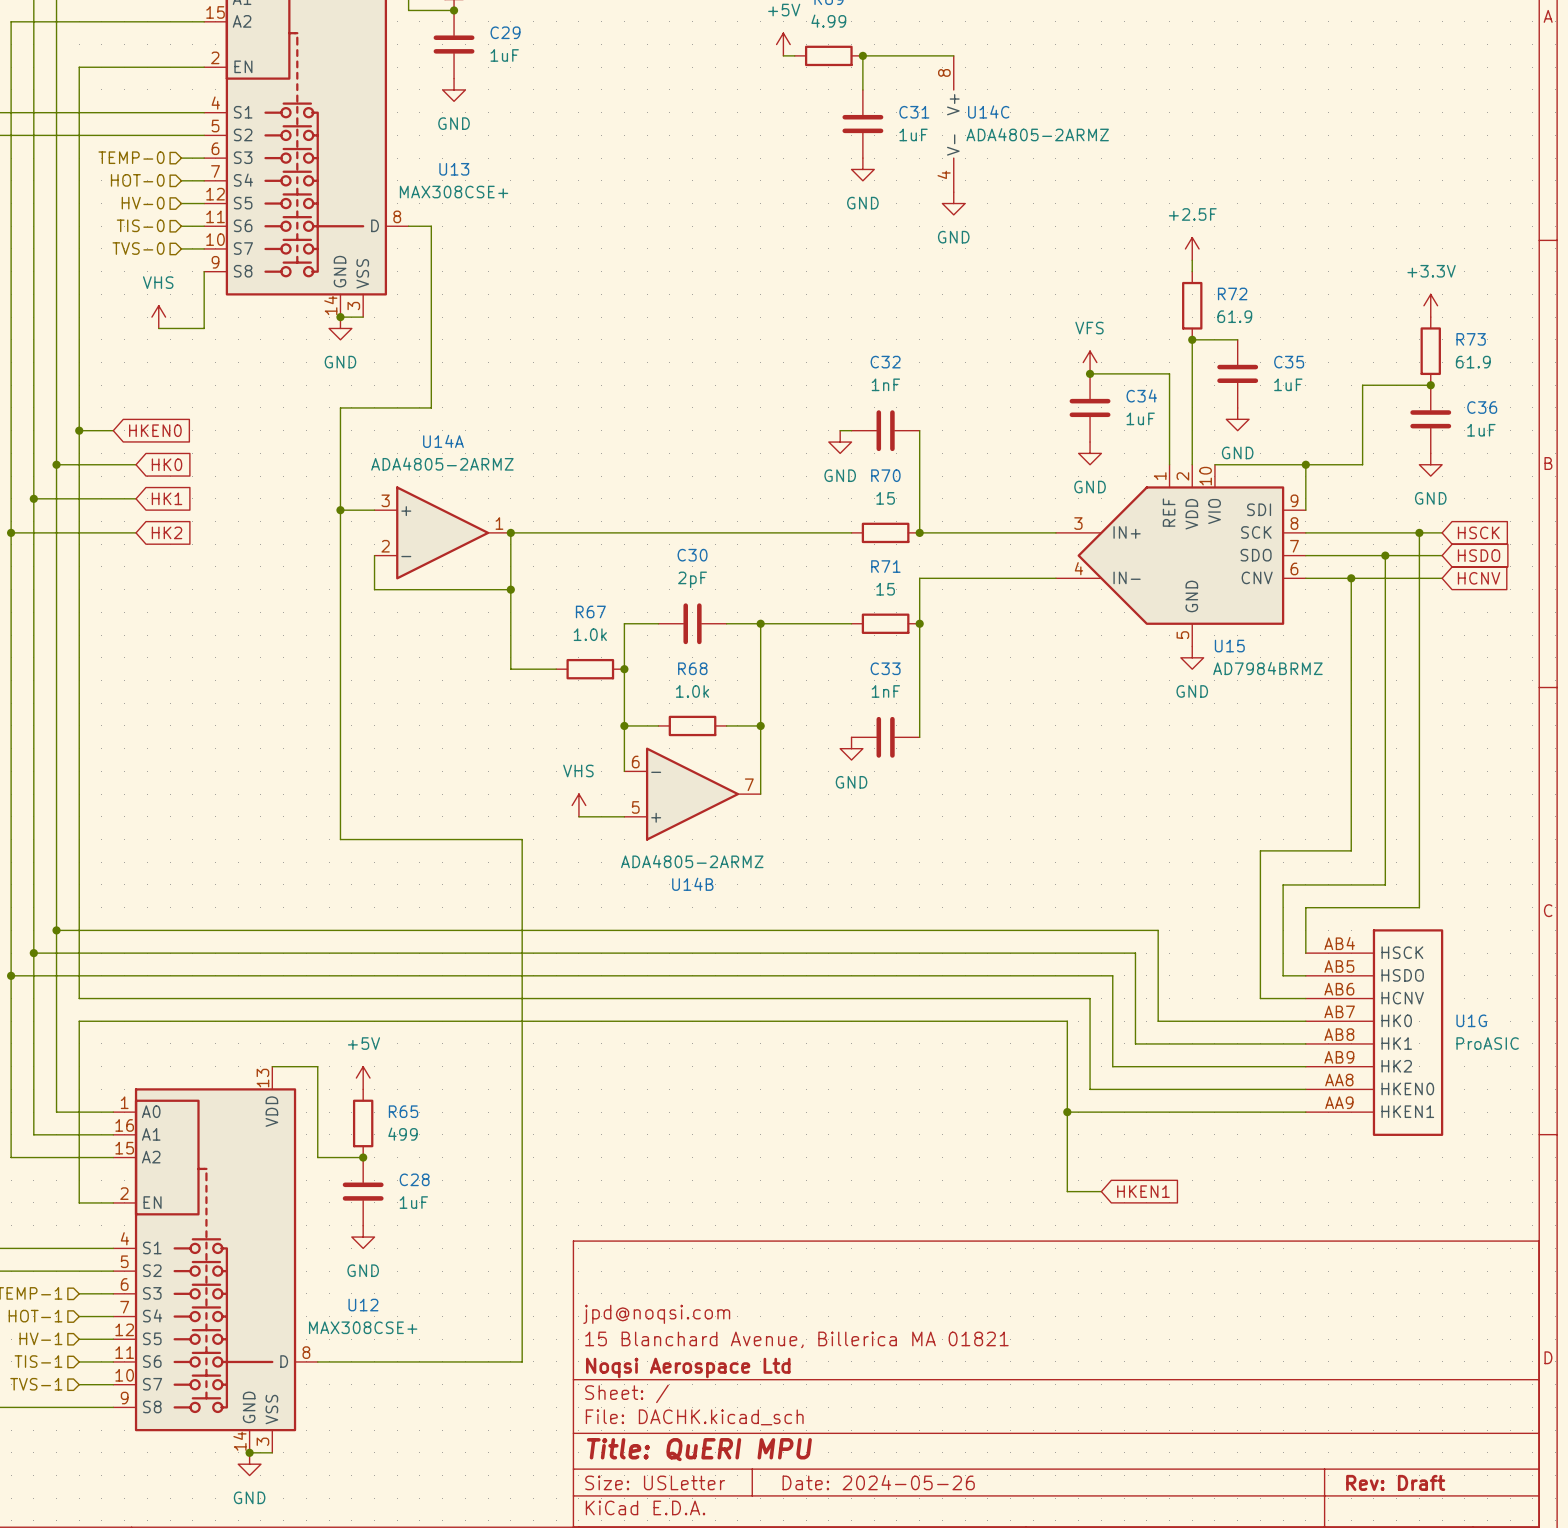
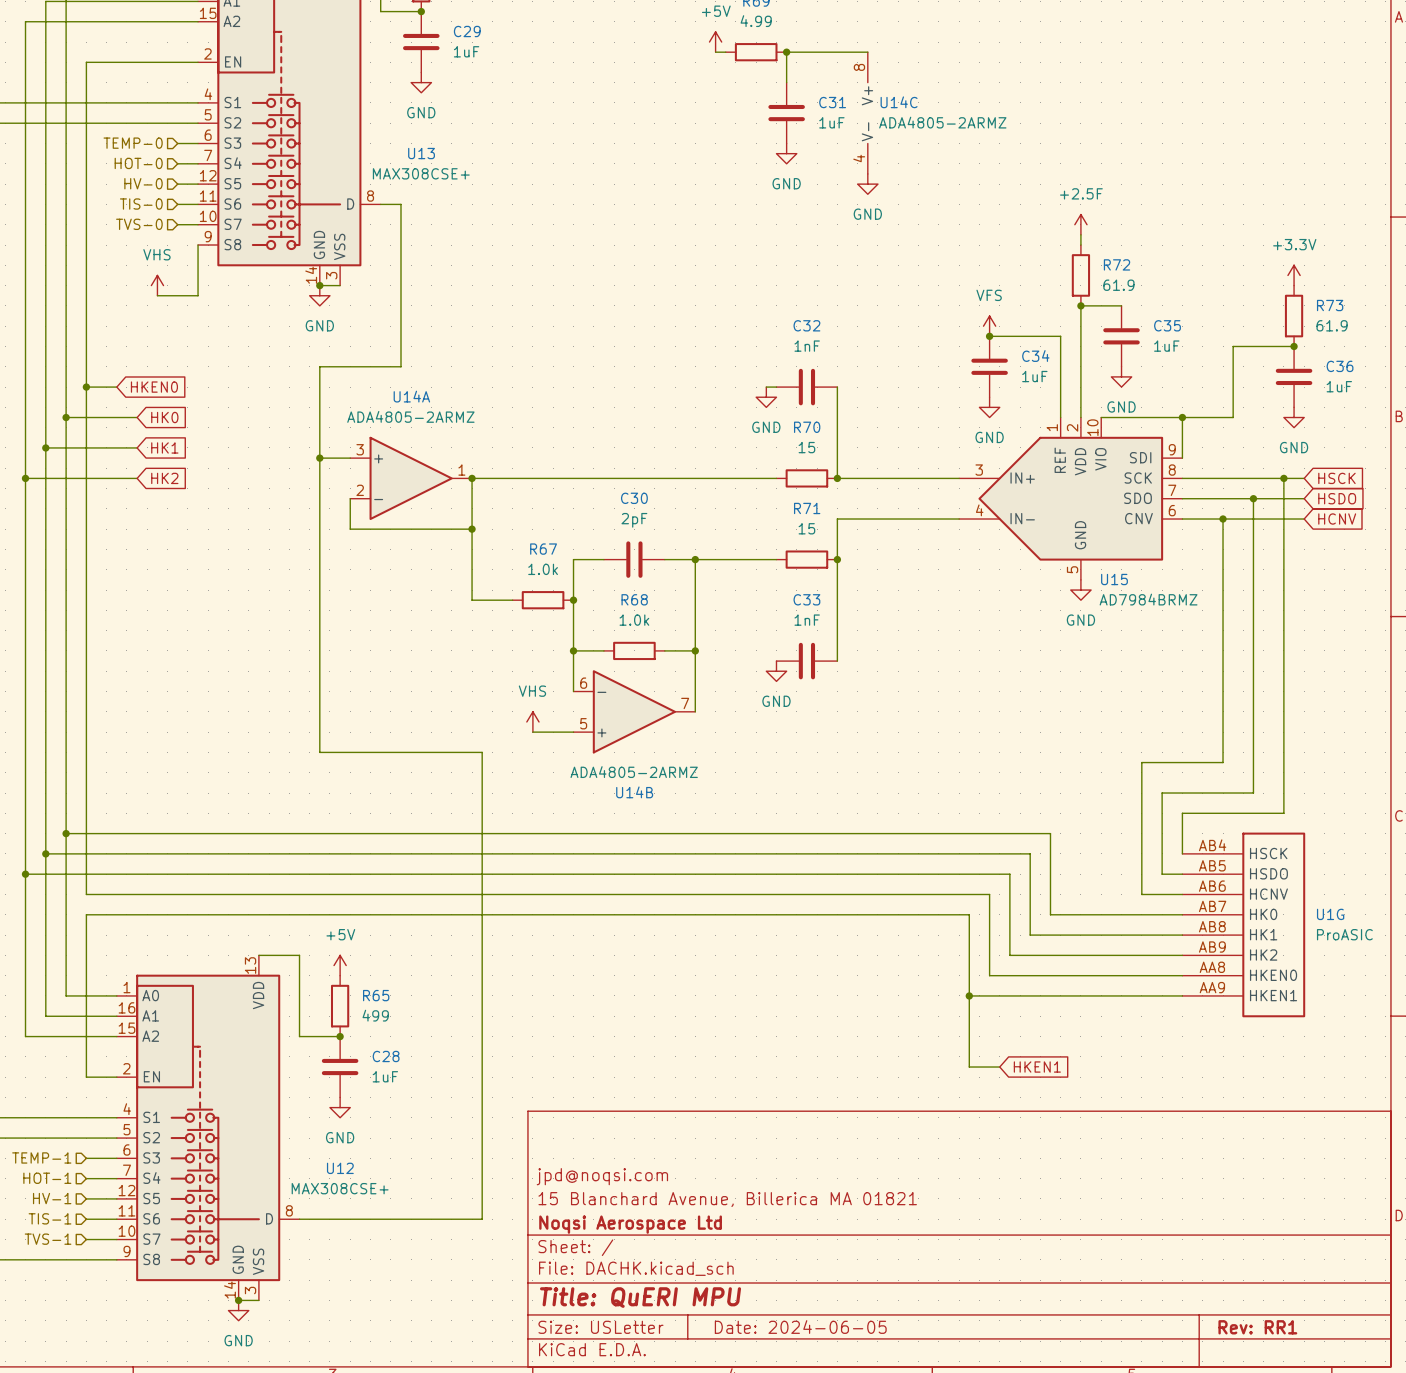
title block: Date: 2024-05-26 (878, 1482) -> Date: 2024-06-05 (800, 1327)
title block: Rev: Draft (1395, 1482) -> Rev: RR1 (1257, 1327)

